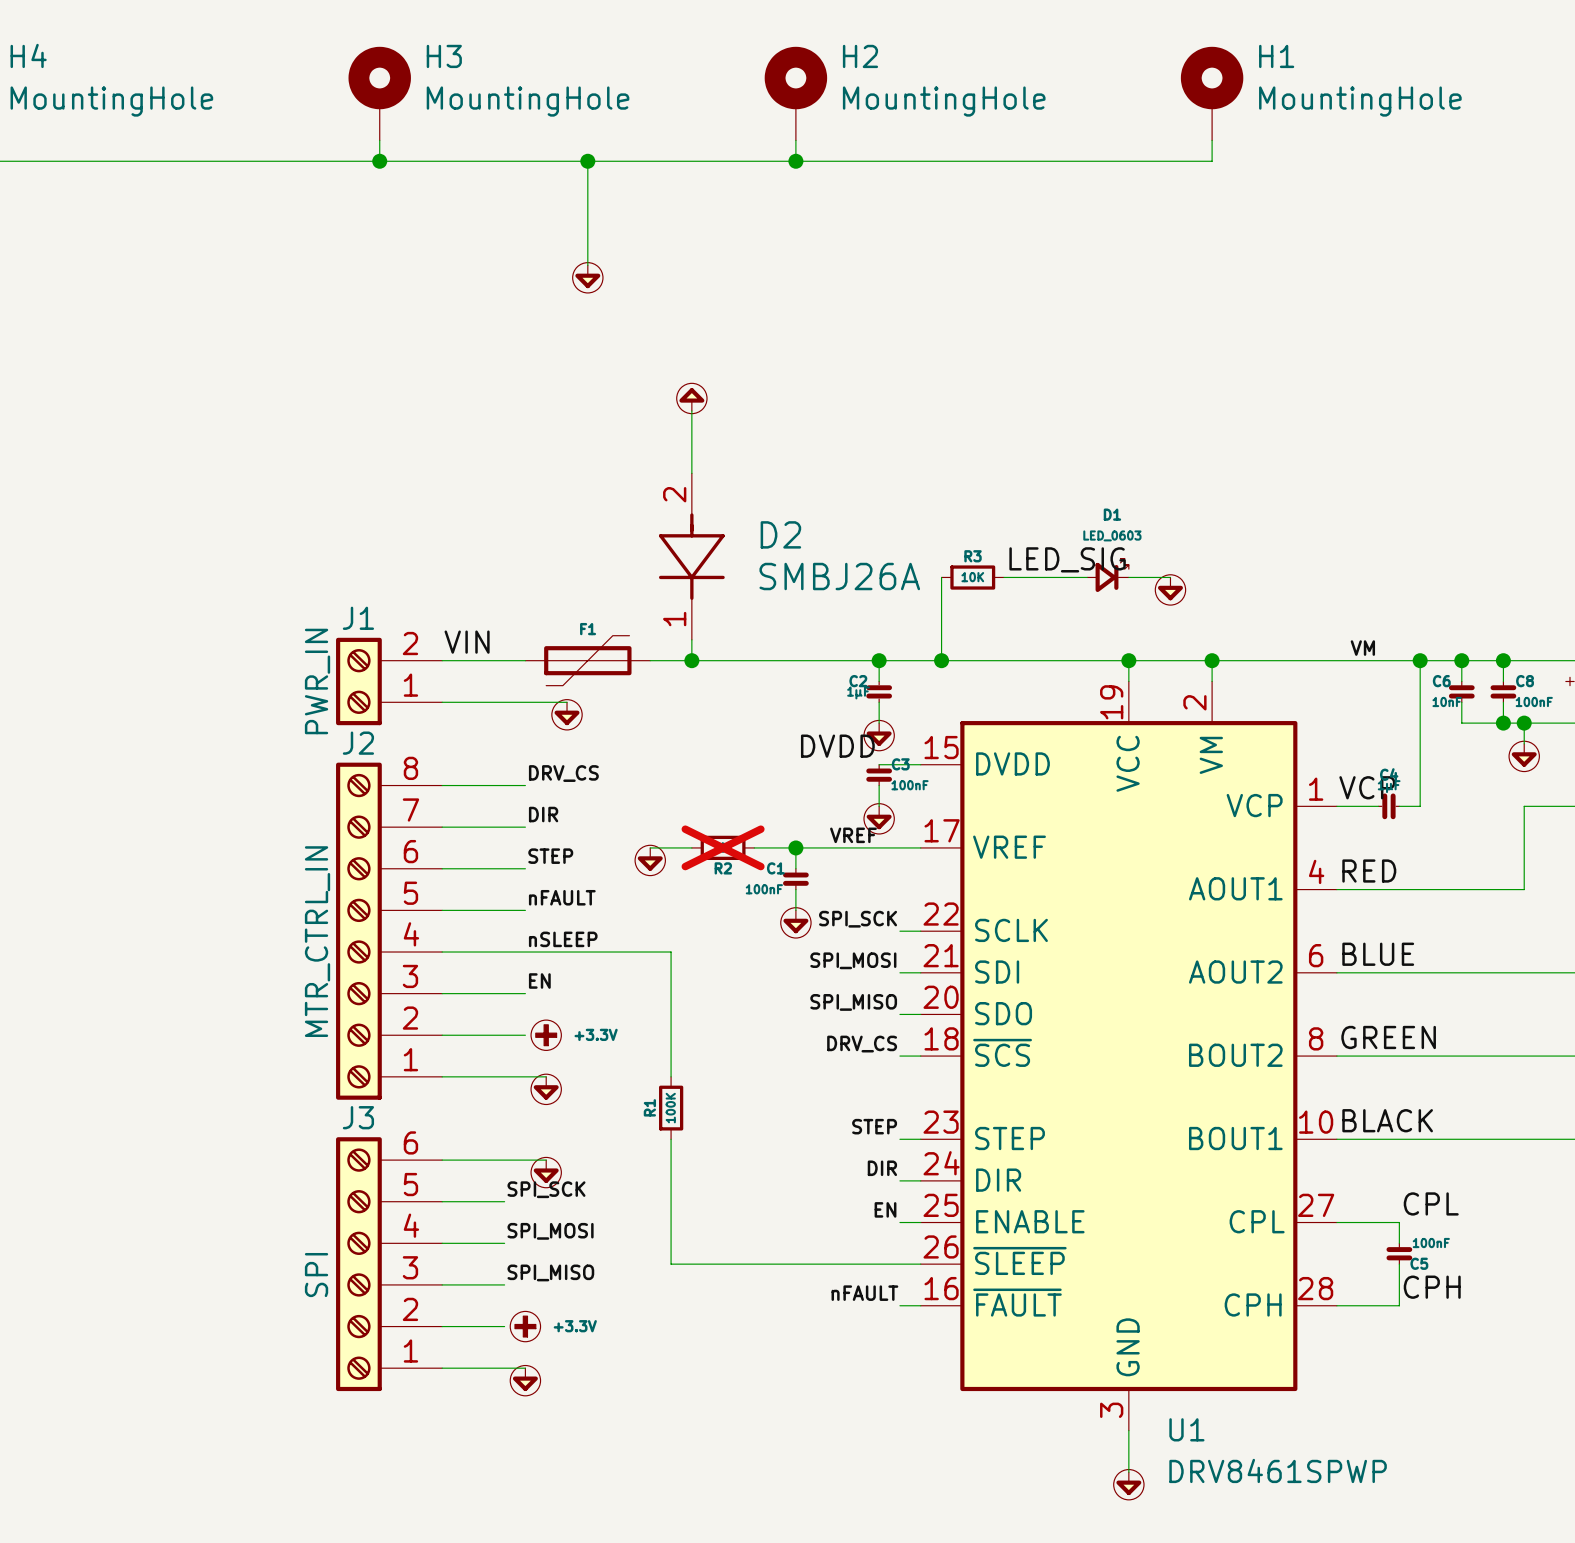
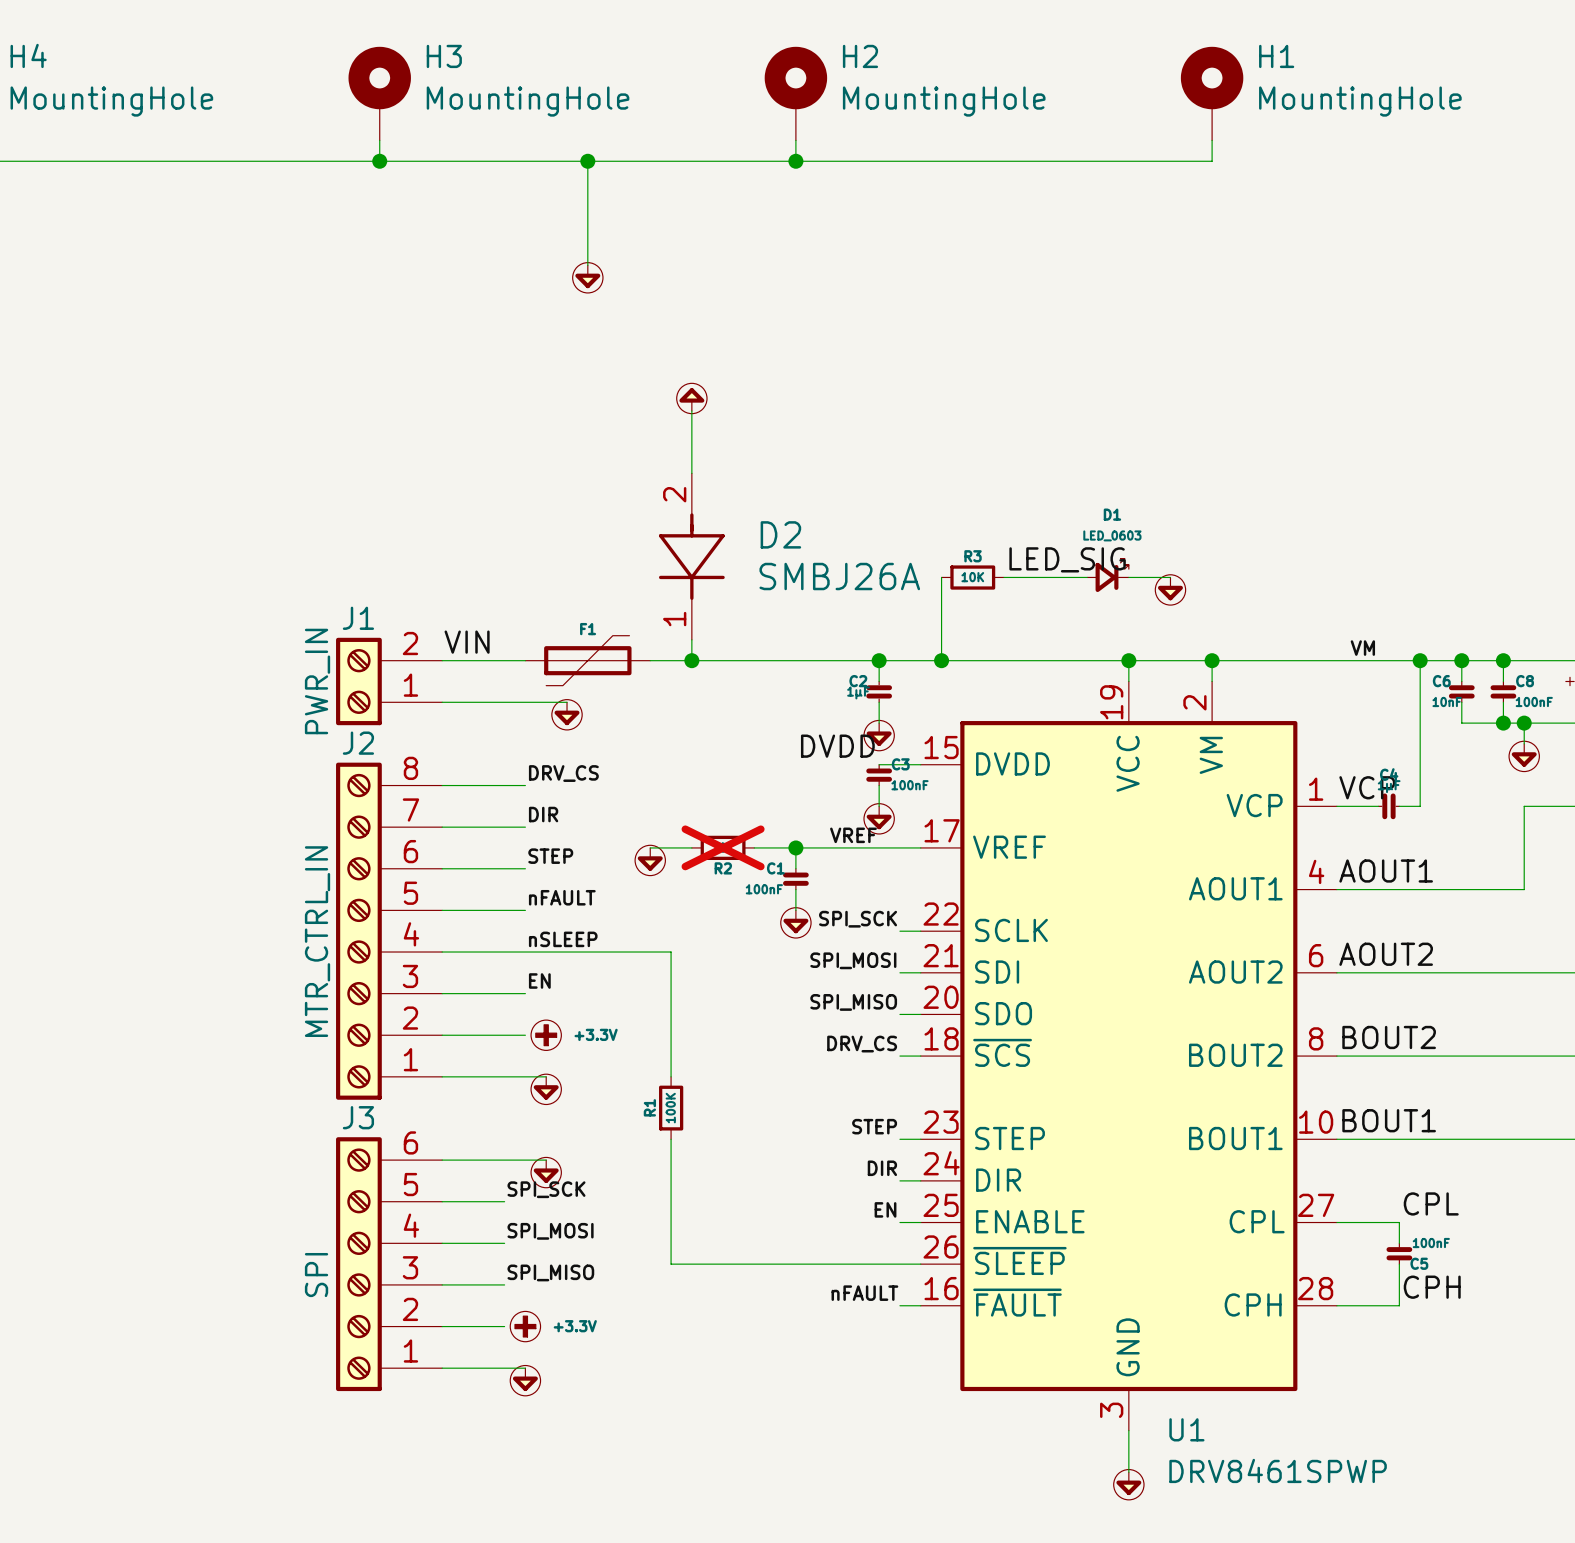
label: RED (1369, 871) -> AOUT1 (1386, 871)
label: BLUE (1378, 954) -> AOUT2 (1386, 954)
label: GREEN (1388, 1037) -> BOUT2 (1389, 1037)
label: BLACK (1387, 1120) -> BOUT1 (1389, 1120)

